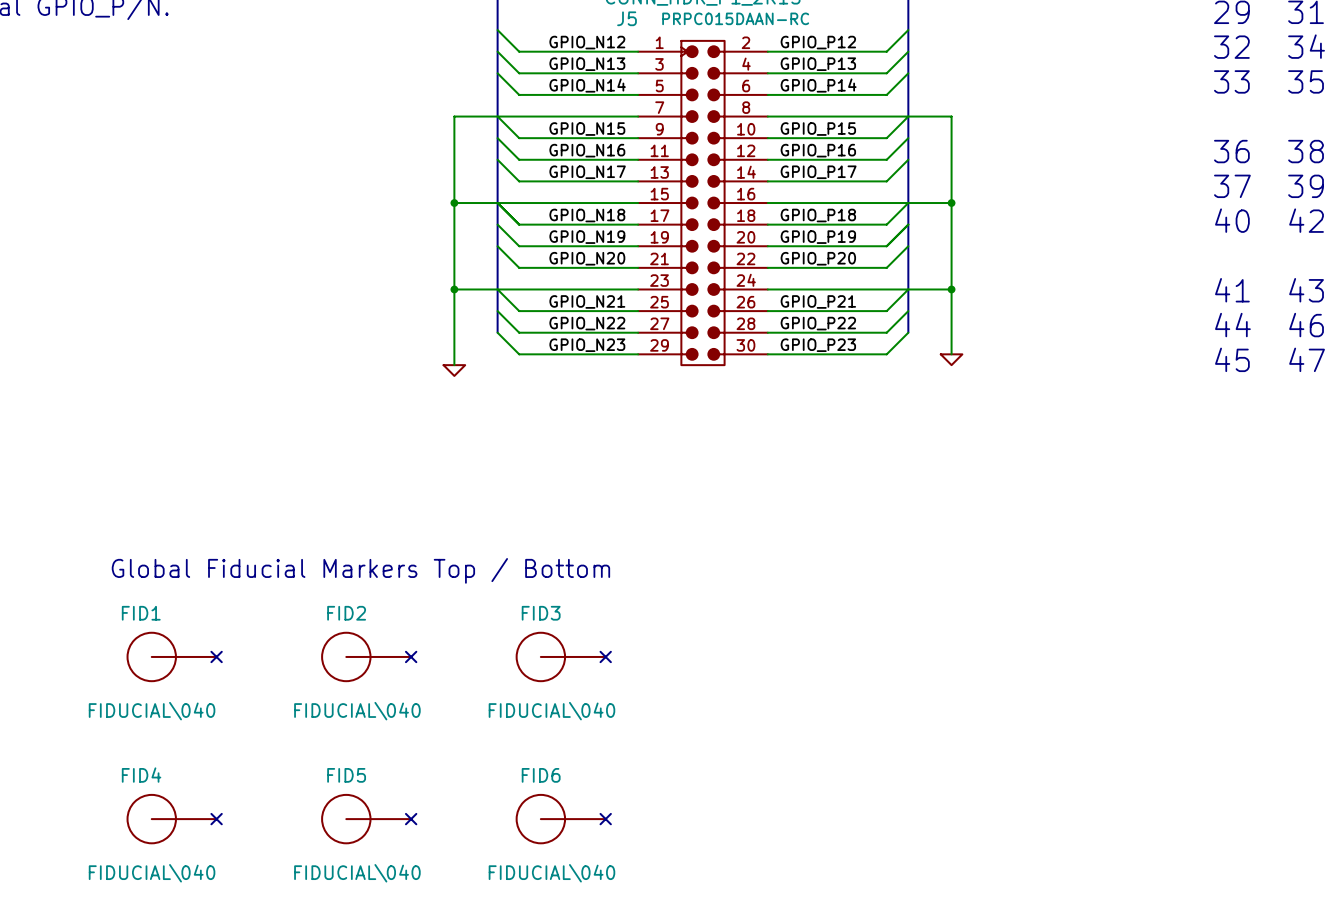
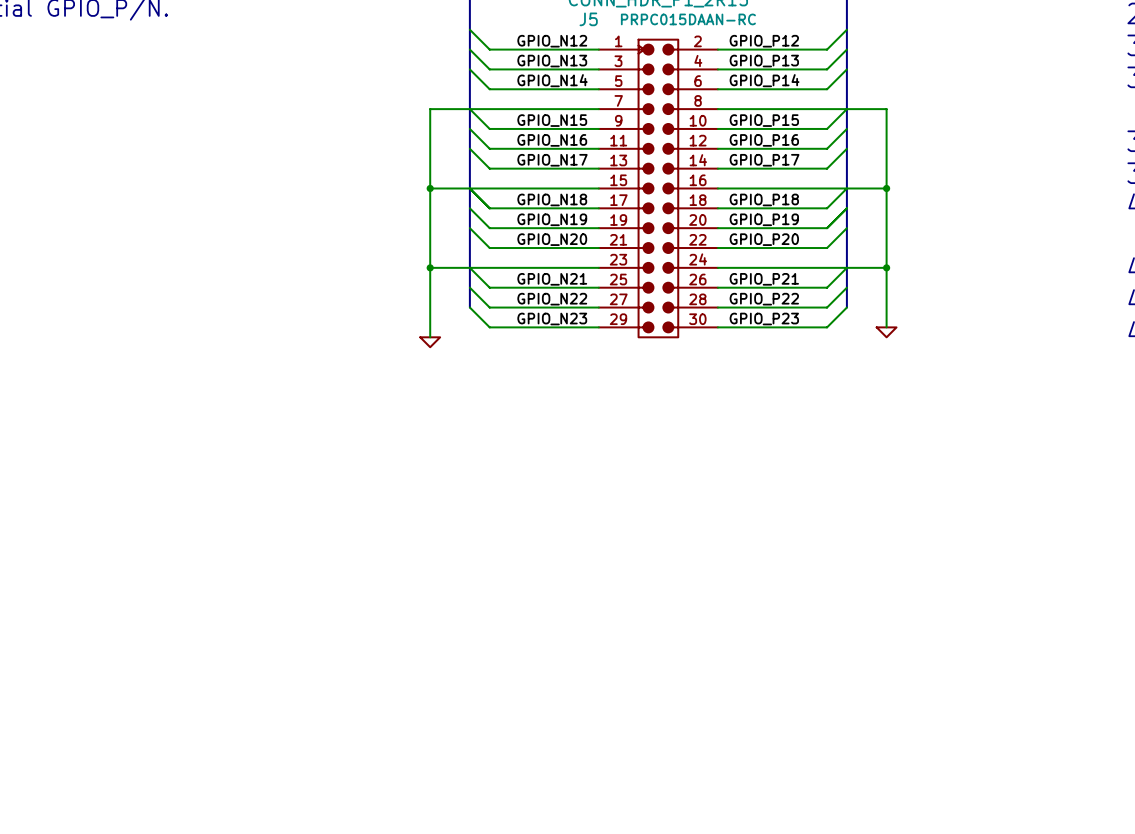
text: Global Fiducial Markers Top / Bottom (360, 570) -> none
FID1: FIDUCIAL\040 (172, 656) -> none
no-connect mark: (216, 656) -> none
FID2: FIDUCIAL\040 (366, 656) -> none
no-connect mark: (411, 656) -> none
FID3: FIDUCIAL\040 (561, 656) -> none
no-connect mark: (605, 656) -> none
FID4: FIDUCIAL\040 (172, 819) -> none
no-connect mark: (216, 819) -> none
FID5: FIDUCIAL\040 (366, 819) -> none
no-connect mark: (411, 819) -> none
FID6: FIDUCIAL\040 (561, 819) -> none
no-connect mark: (605, 819) -> none

